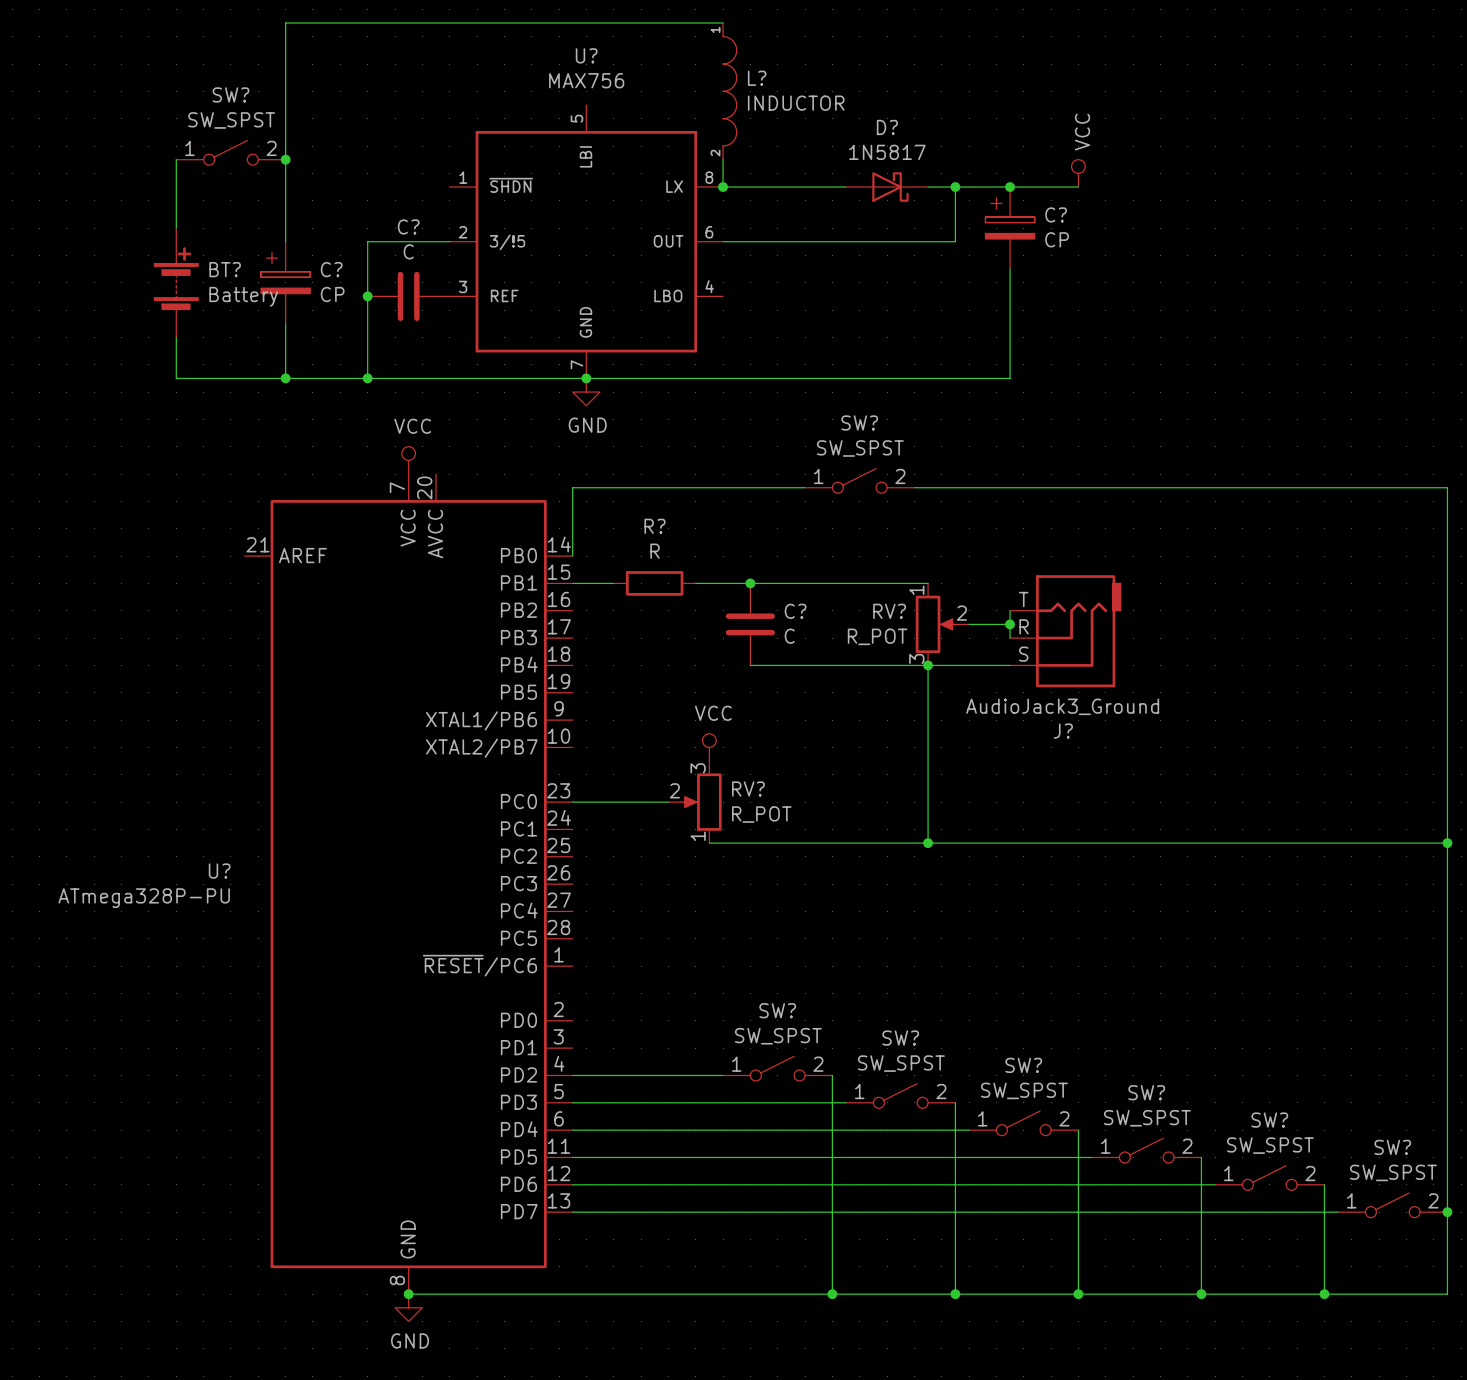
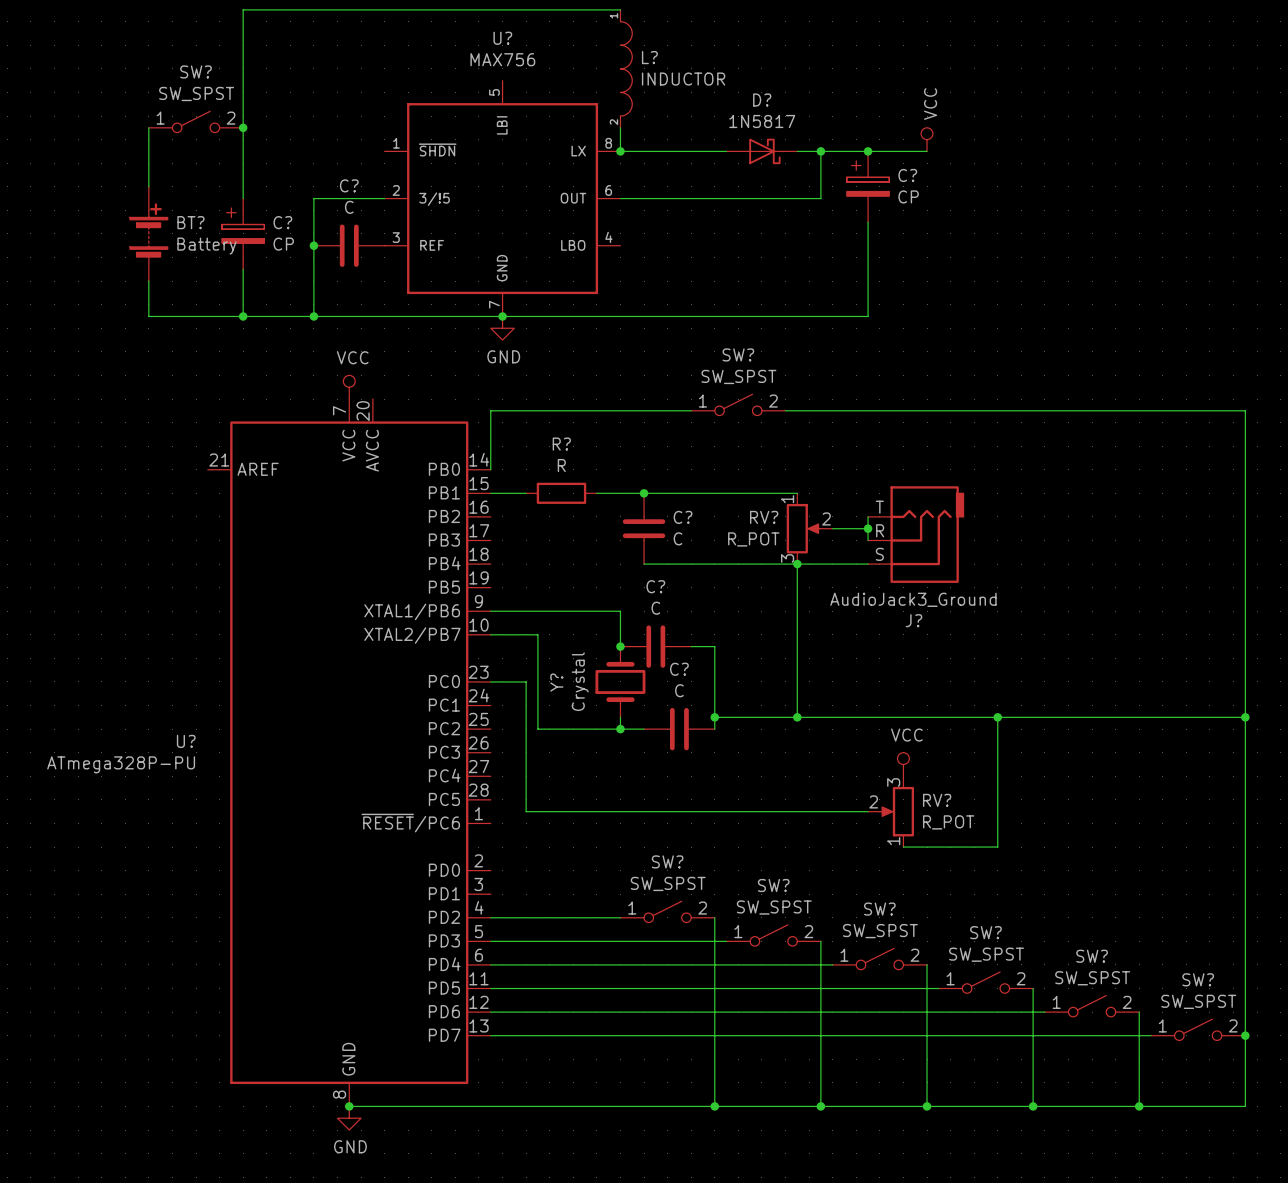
wire: none -> (490, 611) (620, 611) (620, 646)
wire: none -> (490, 634) (537, 634) (537, 729) (644, 729)
power symbol: VCC (709, 747) -> none
junction: none -> (620, 646)
C?: none -> C (655, 646)
wire: none -> (691, 646) (714, 646) (714, 729)
wire: (613, 802) (668, 802) -> (526, 681) (526, 811) (868, 811)
RV?: R_POT (695, 802) -> none
Y?: none -> Crystal (620, 681)
wire: (709, 843) (832, 843) -> none
wire: none -> (620, 717) (620, 729)
junction: none -> (714, 717)
wire: none -> (997, 717) (997, 847) (903, 847)
junction: none -> (997, 717)
junction: none -> (620, 729)
C?: none -> C (679, 729)
power symbol: none -> VCC (903, 764)
RV?: none -> R_POT (891, 811)

